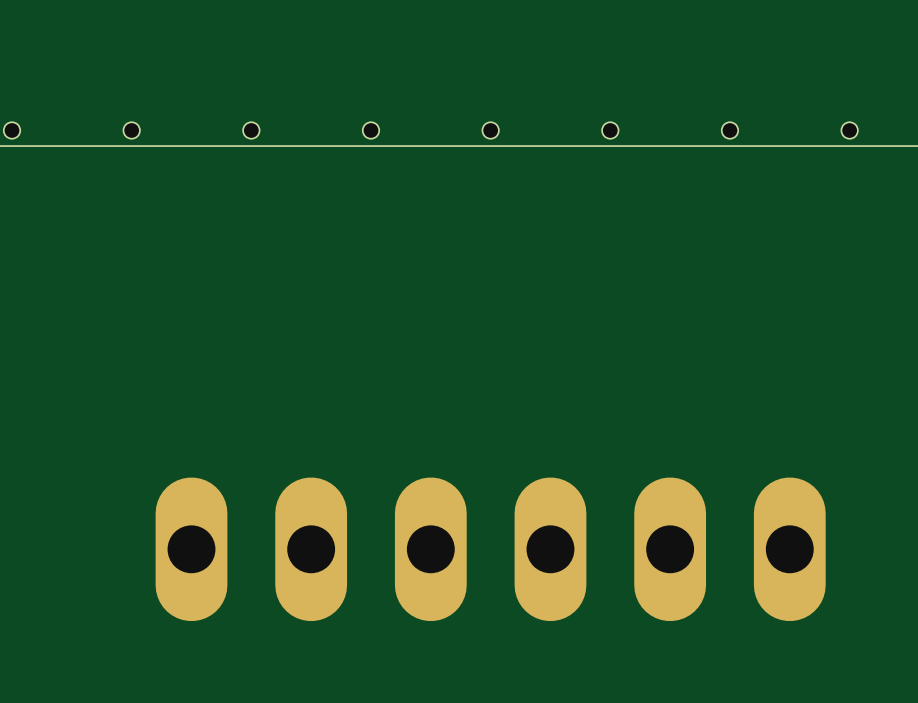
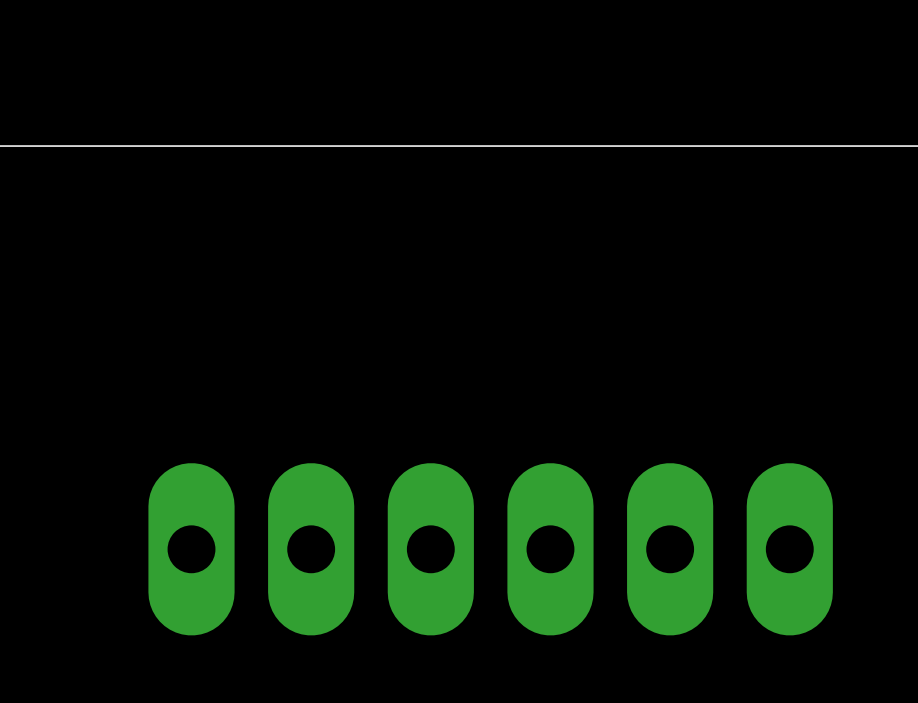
hole: (12, 130) -> none
hole: (131, 130) -> none
hole: (251, 130) -> none
hole: (370, 130) -> none
hole: (490, 130) -> none
hole: (610, 130) -> none
hole: (729, 130) -> none
hole: (849, 130) -> none
part footprint: [155, 477, 826, 622] -> [148, 463, 833, 636]

